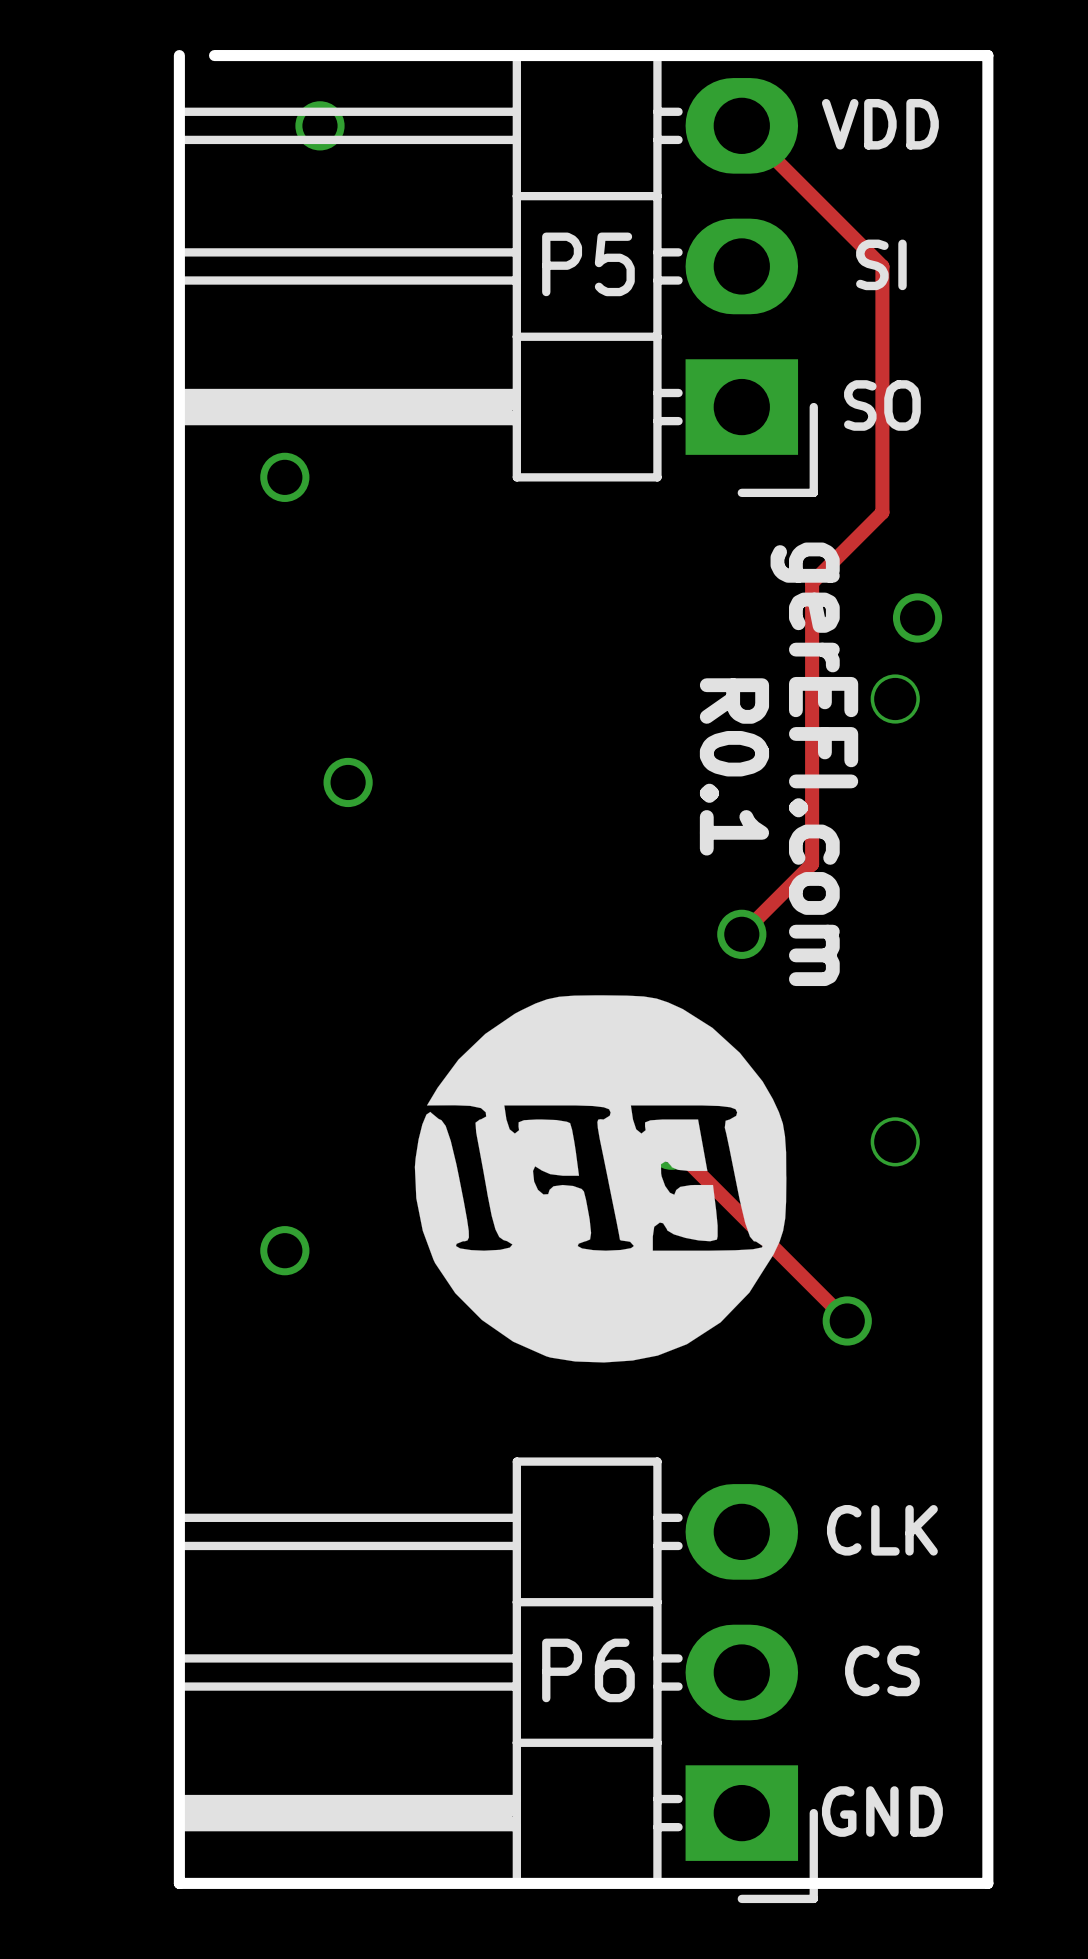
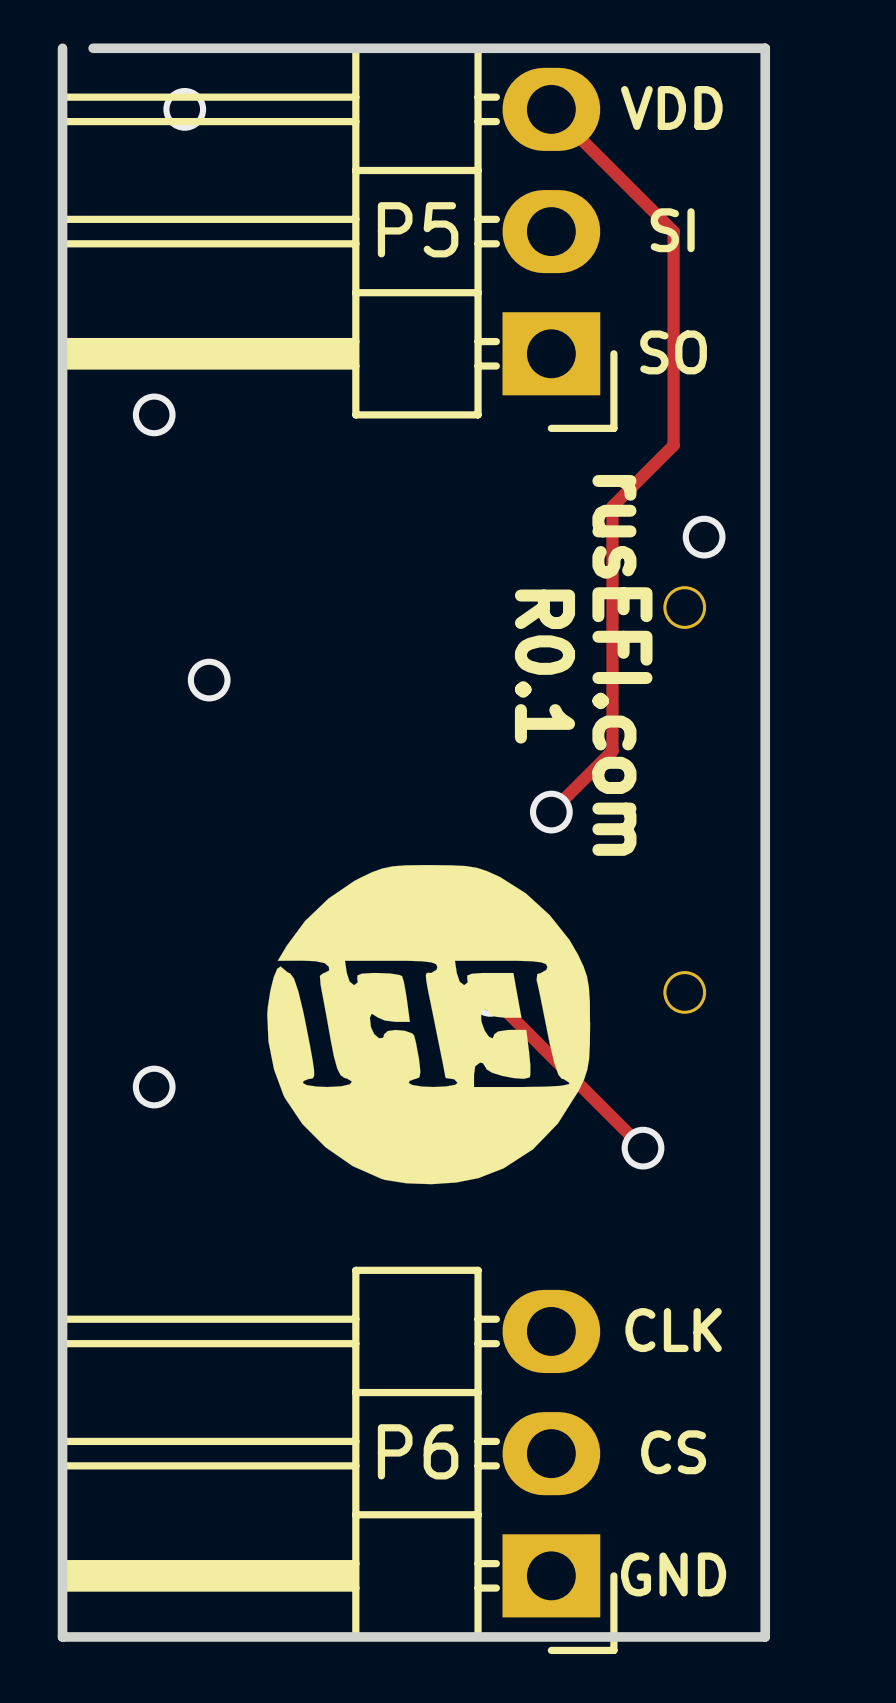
text: gerEFI.com (814, 764) -> rusEFI.com (622, 665)

